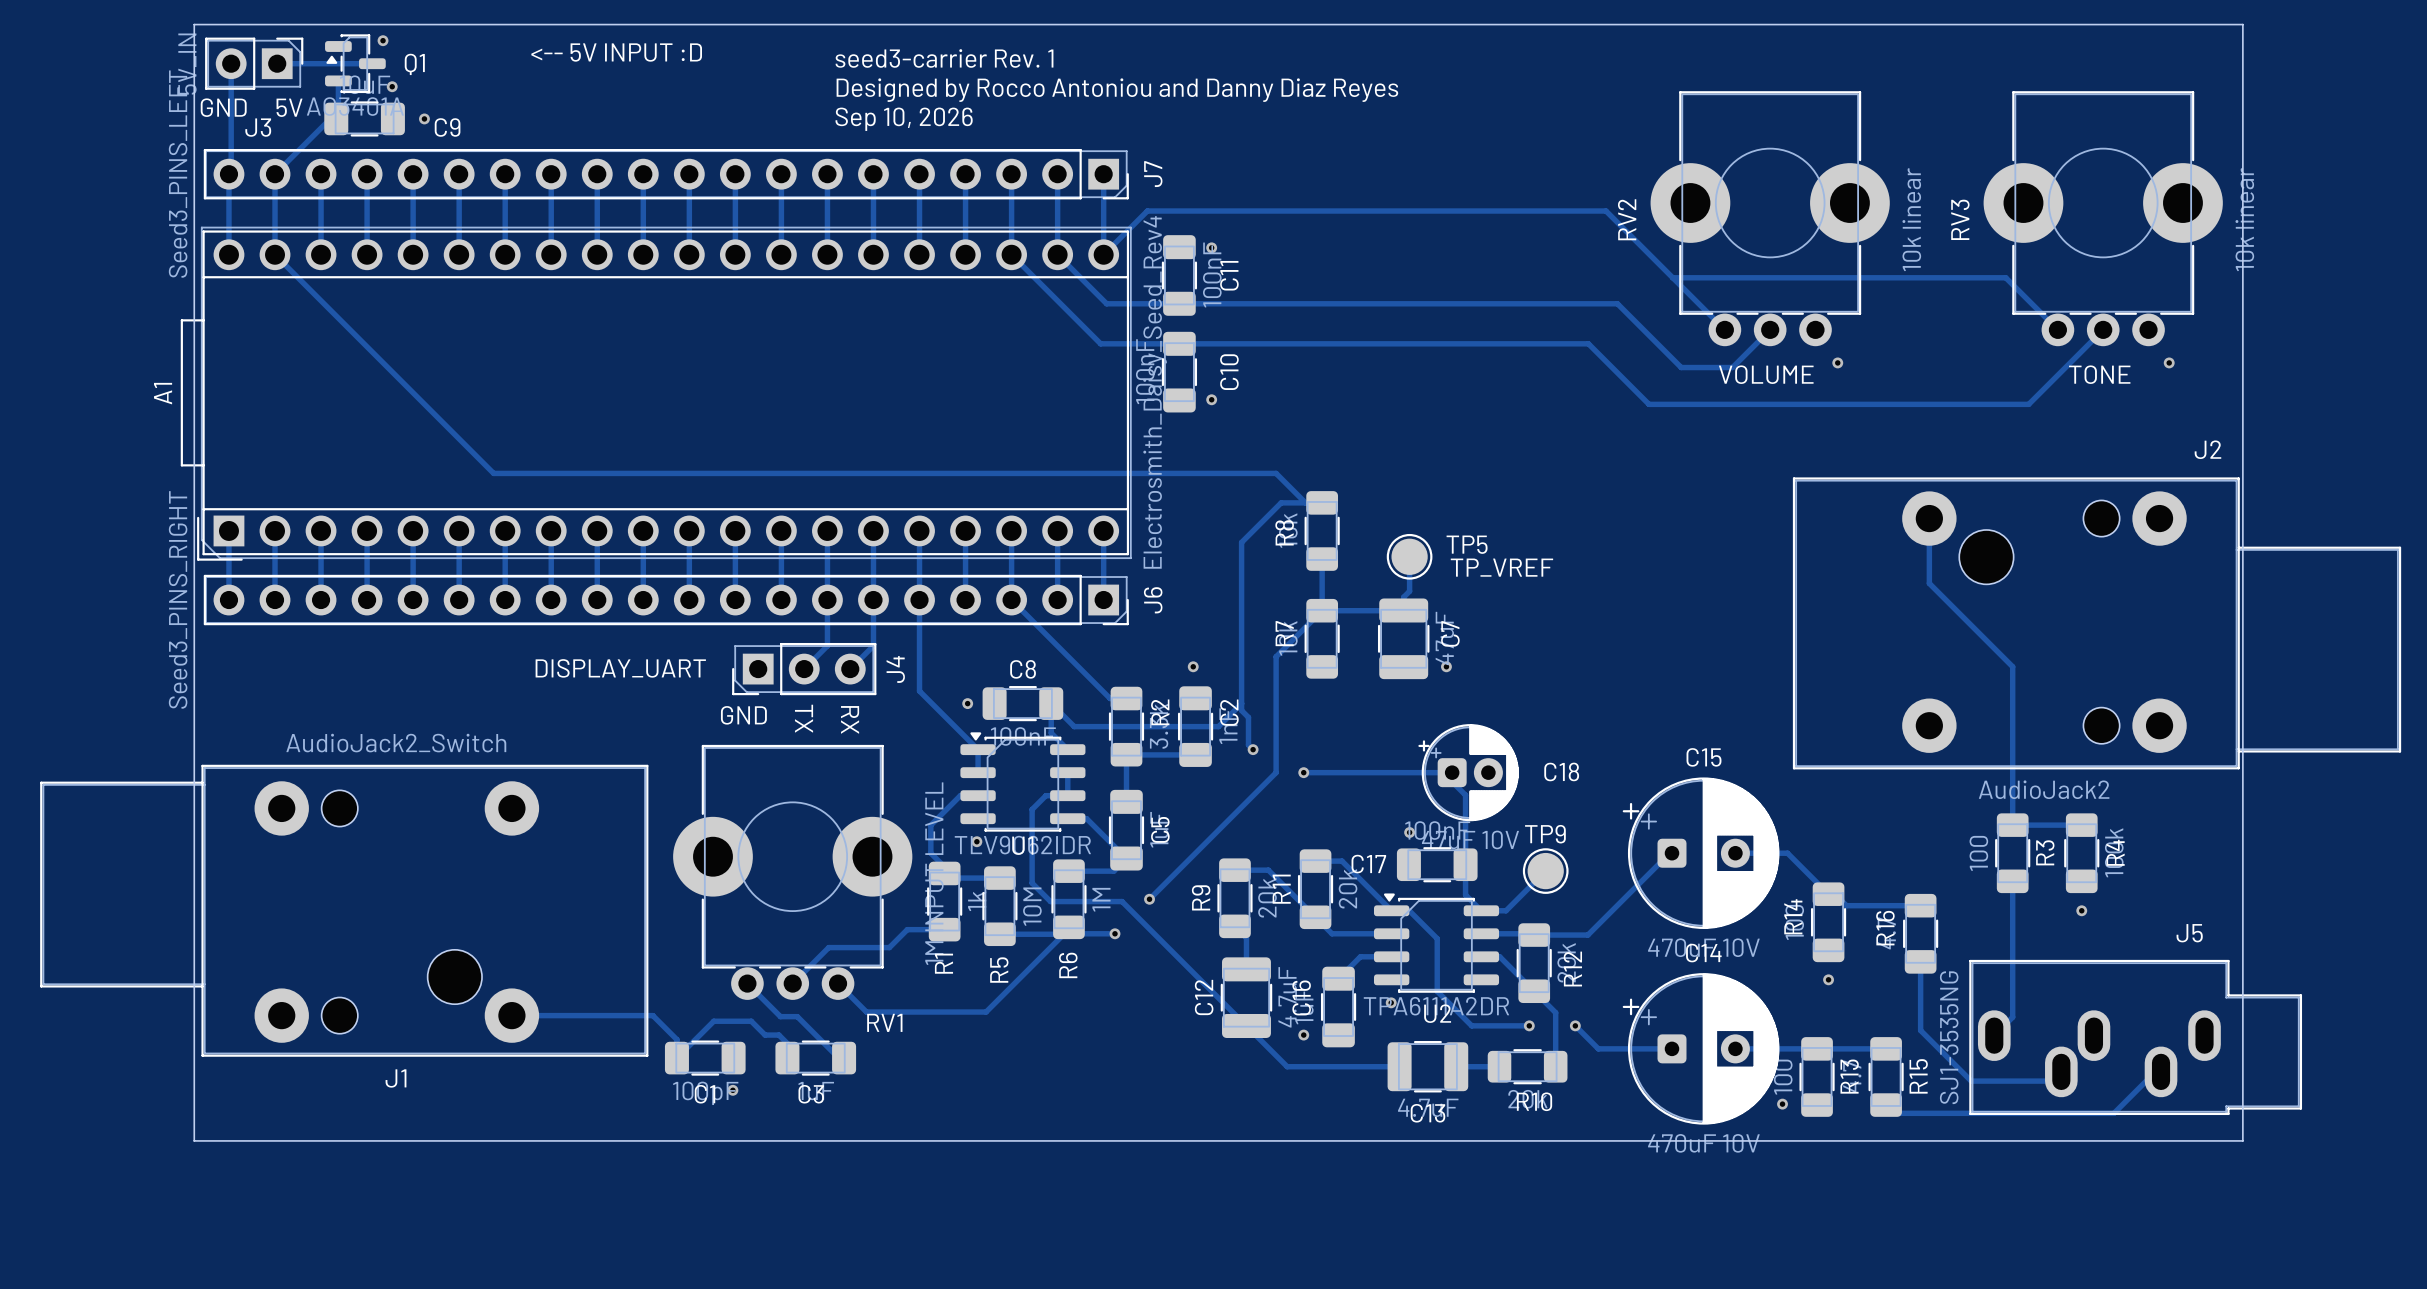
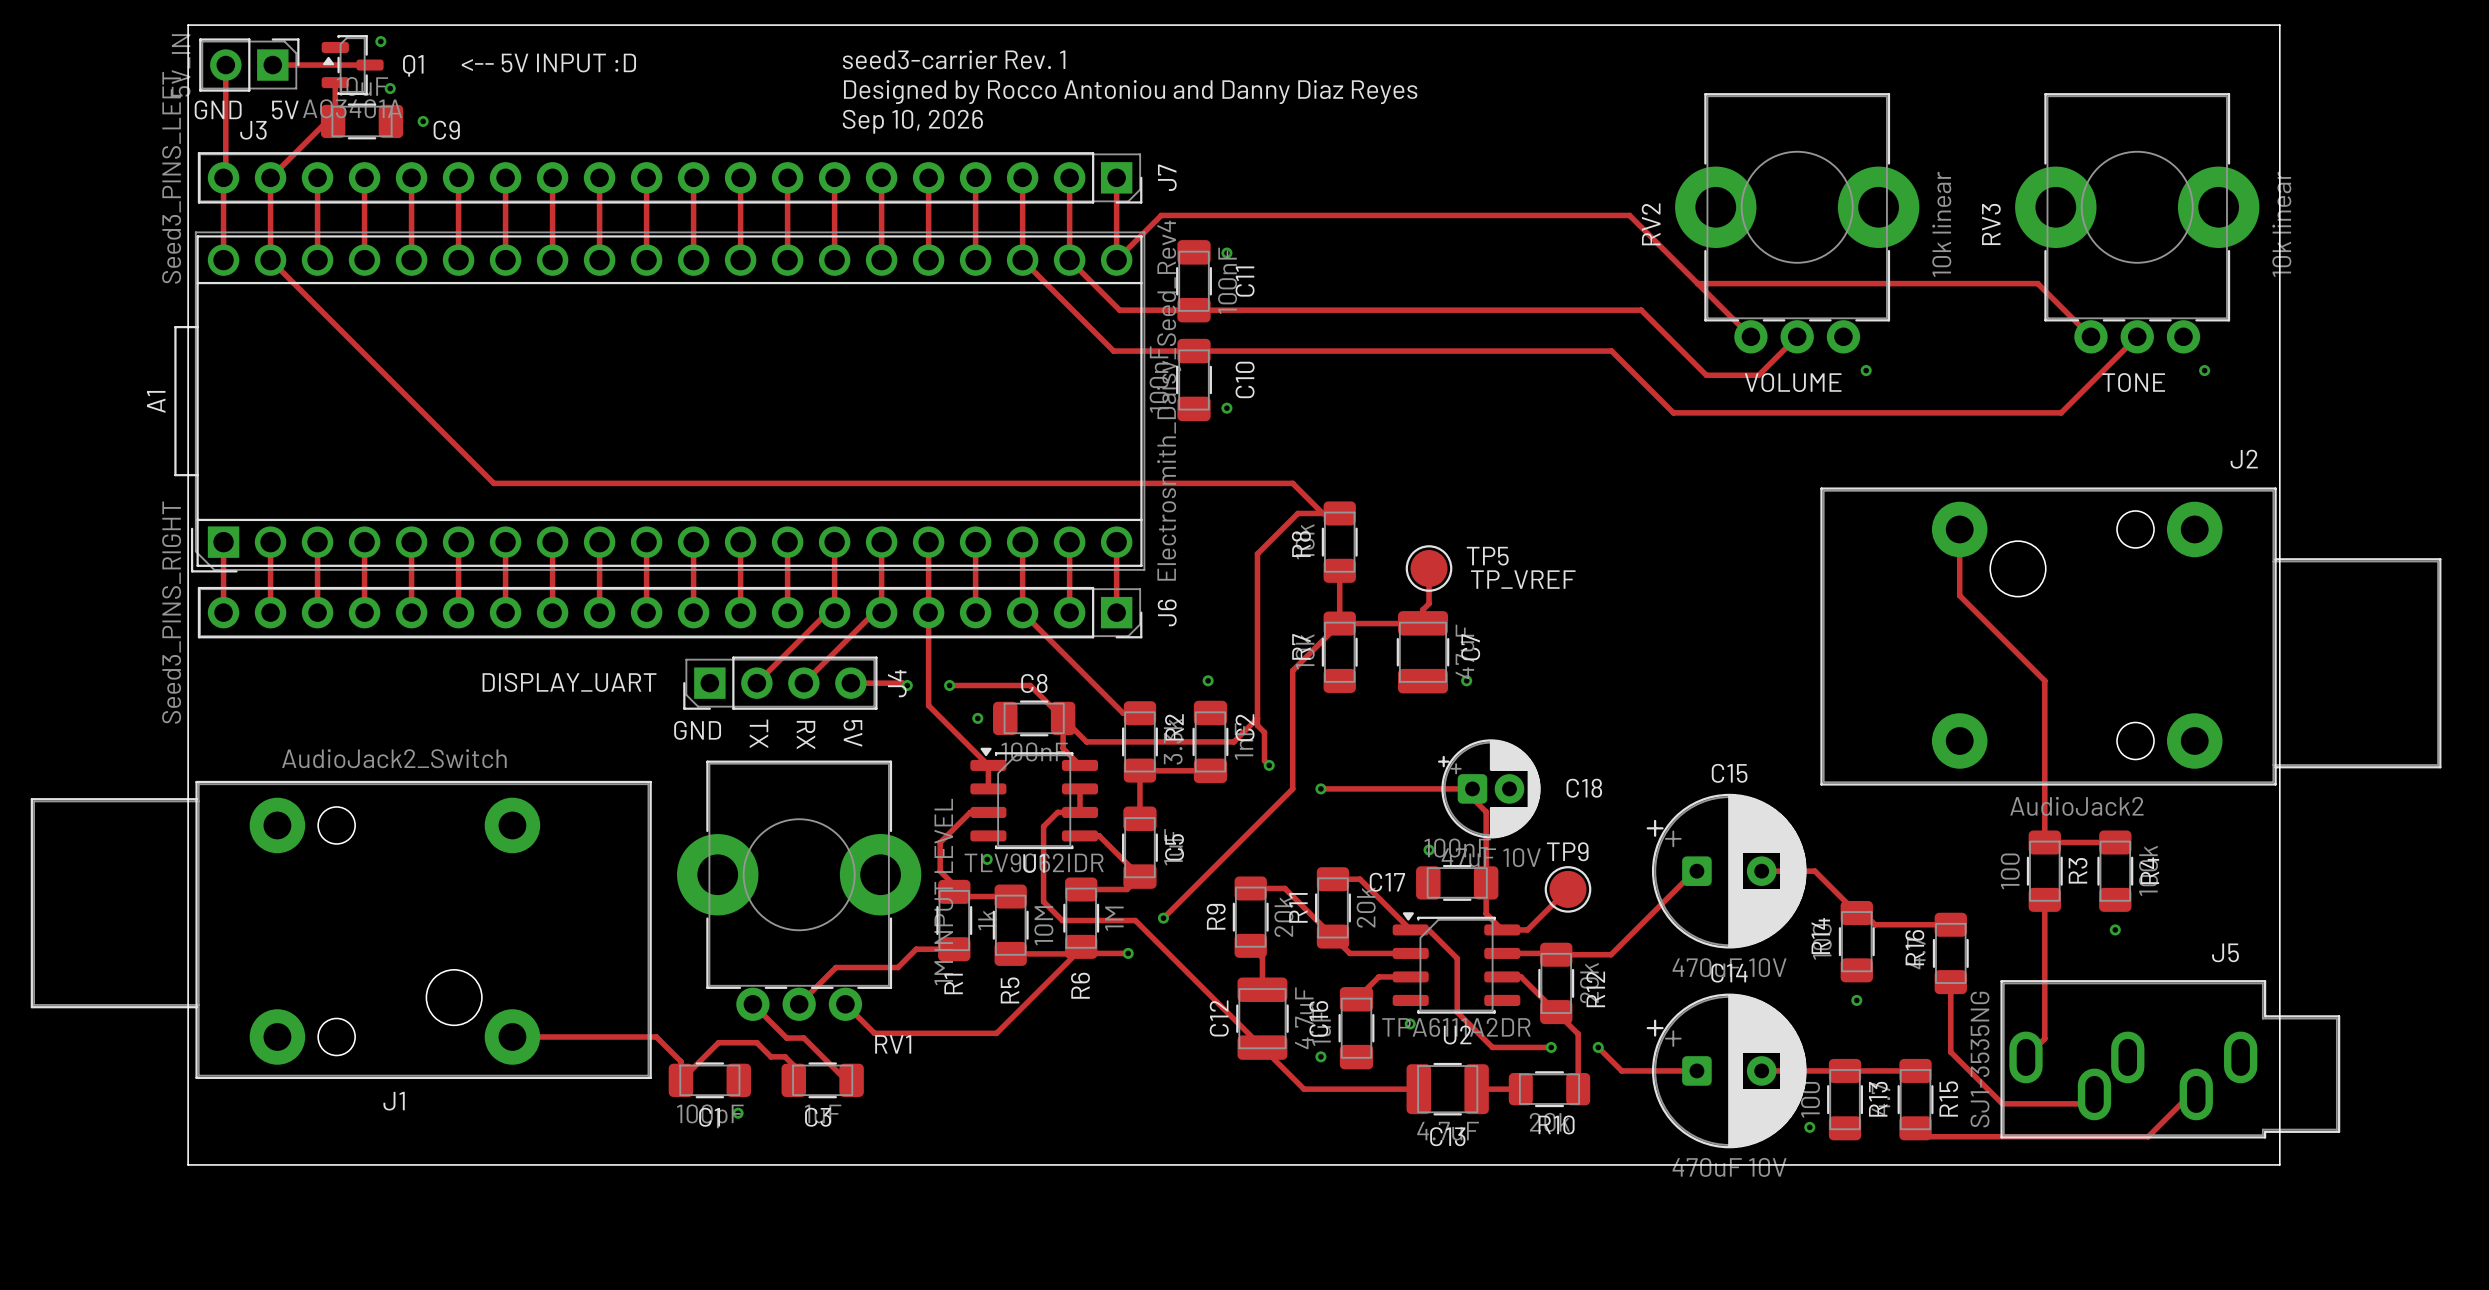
text position: <-- 5V INPUT :D (616, 52) -> <-- 5V INPUT :D (548, 63)
track: (827, 600) (827, 645) (804, 669) -> (834, 612) (827, 612) (756, 683)
track: (873, 600) (873, 645) (850, 669) -> (881, 612) (874, 612) (803, 683)
J4 footprint: [732, 642, 877, 696] -> [683, 656, 878, 710]
track: none -> (850, 683) (902, 683) (907, 685)
via: none -> (907, 685)
track: none -> (949, 685) (1030, 685) (1063, 718)
via: none -> (949, 685)
text position: GND (743, 715) -> GND (697, 730)
text: none -> TX (758, 733)
text: TX (804, 718) -> RX (805, 735)
text: RX (850, 719) -> 5V (852, 733)

